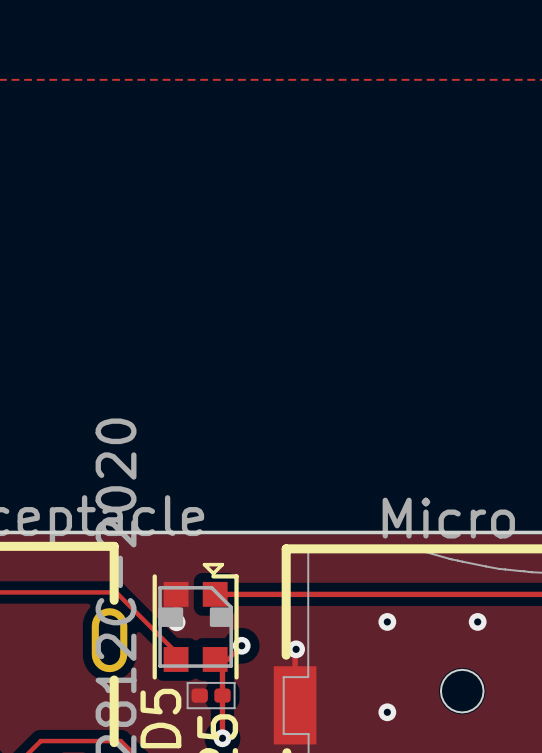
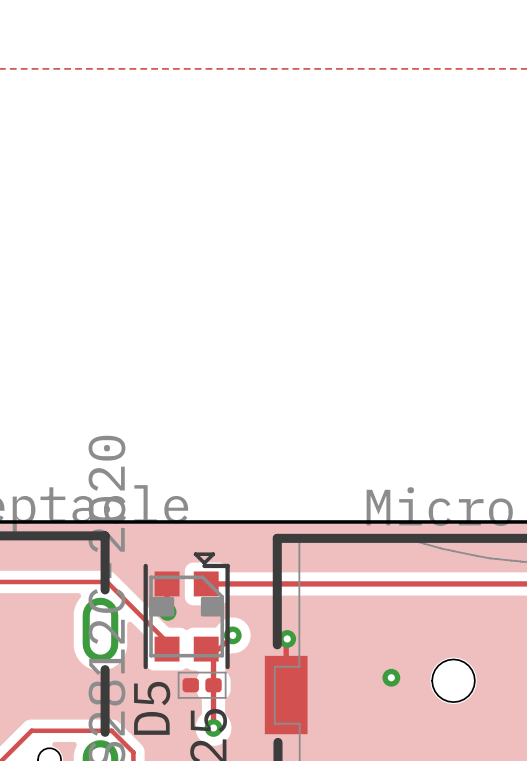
via: (387, 621) -> none
via: (477, 621) -> none
via position: (387, 712) -> (391, 677)

